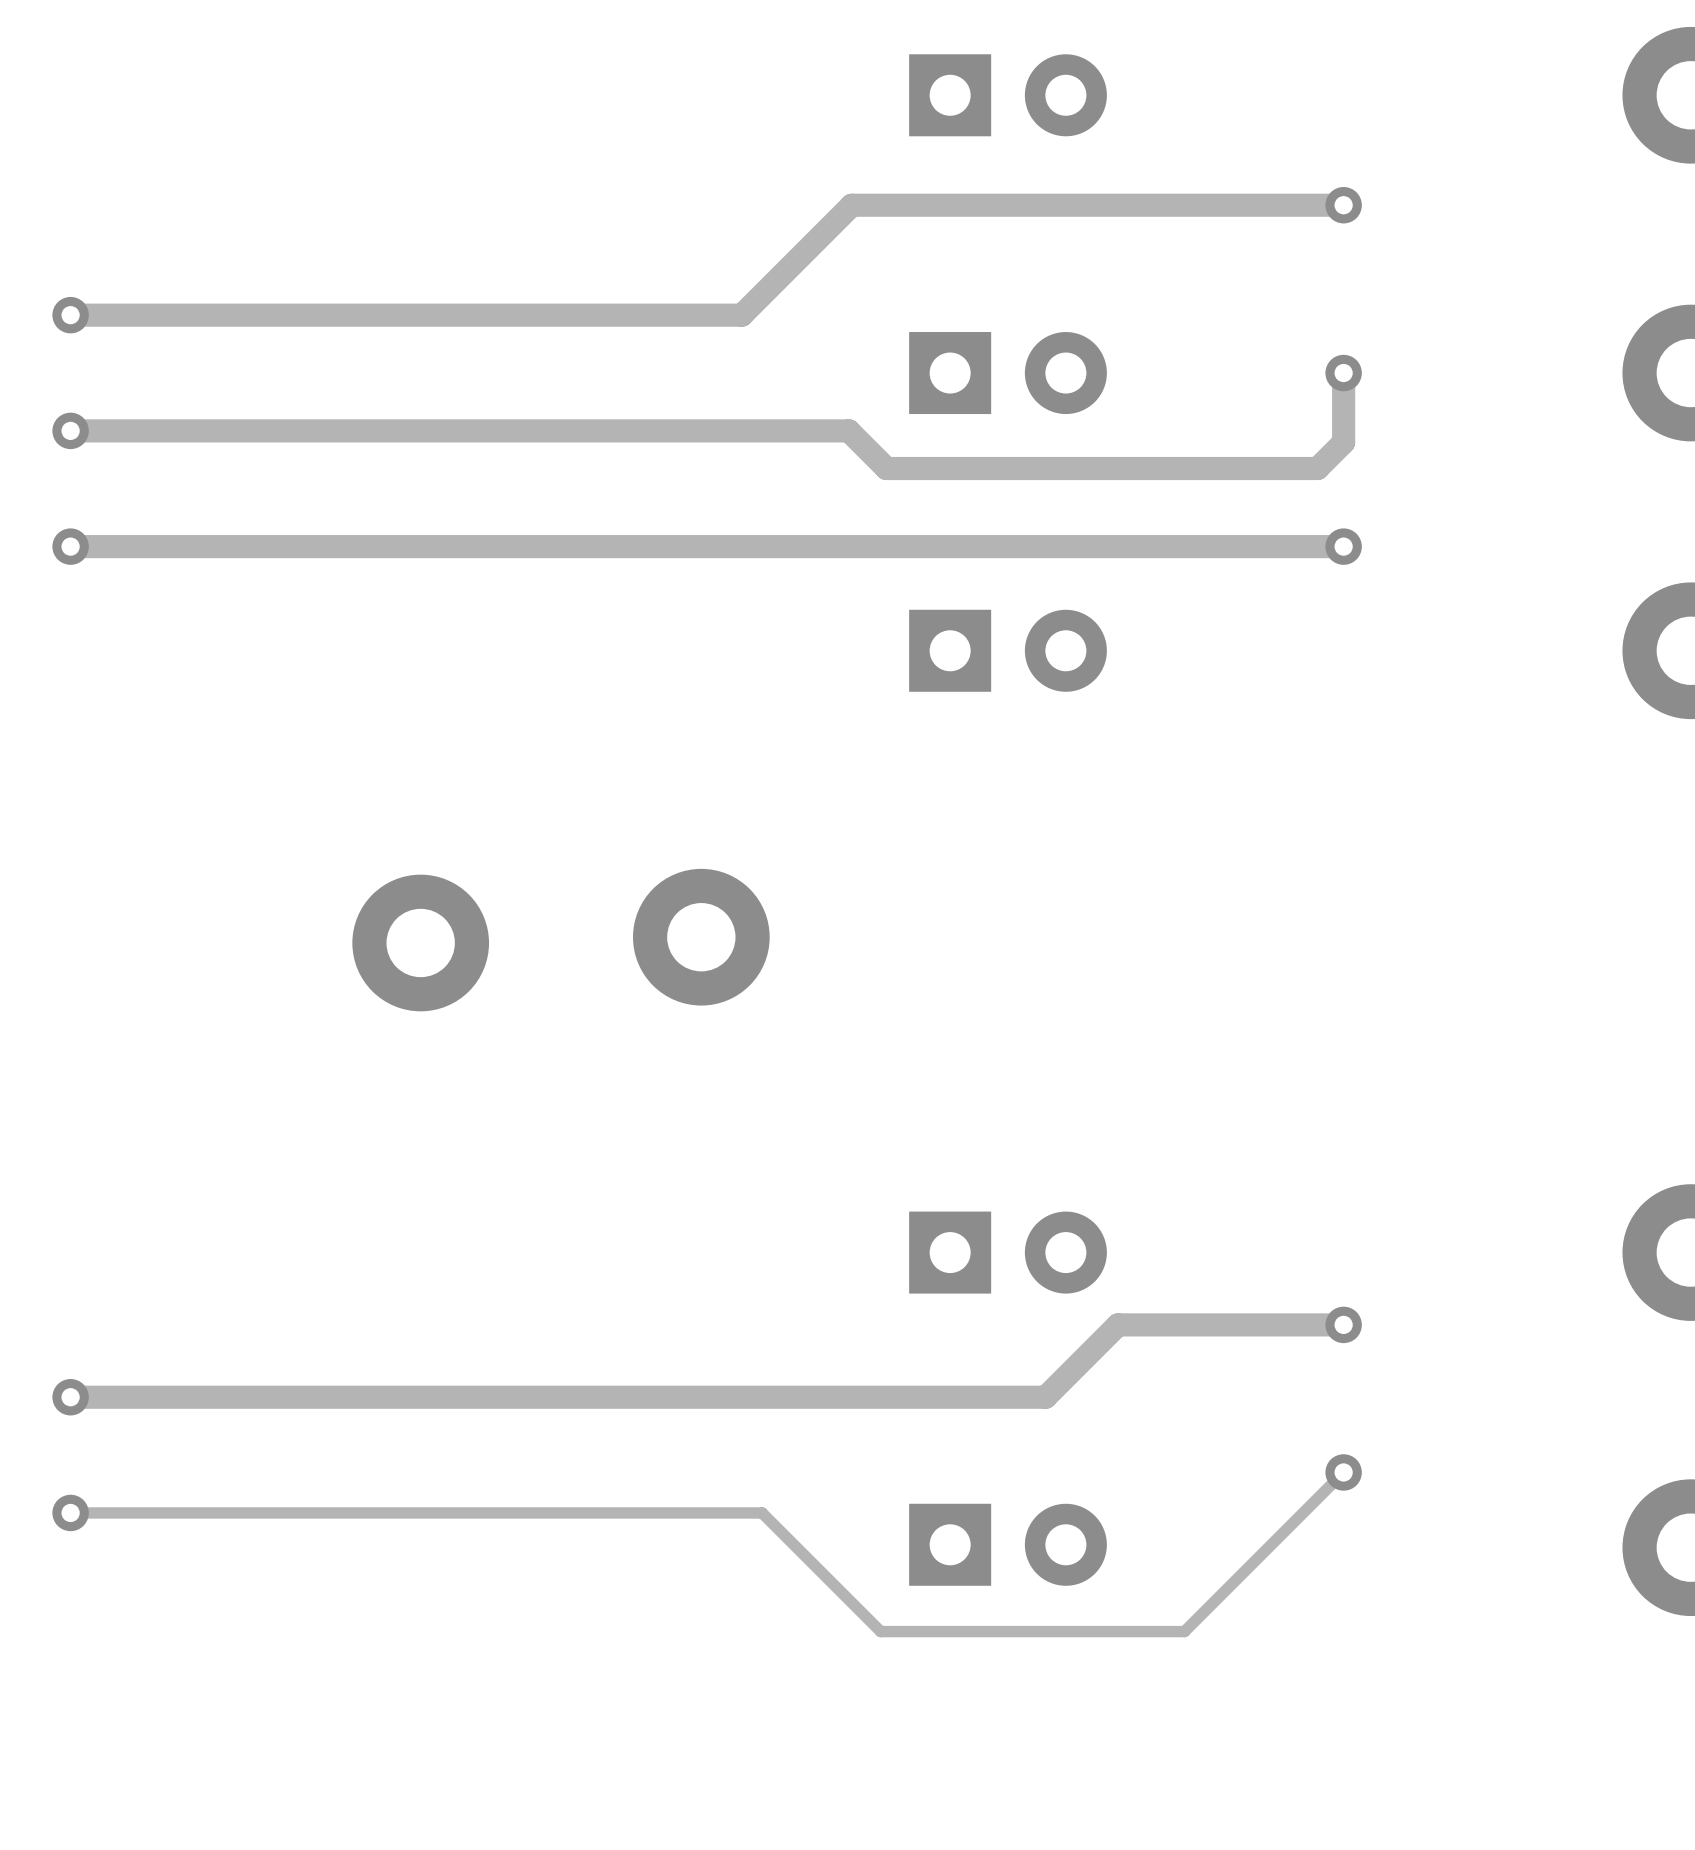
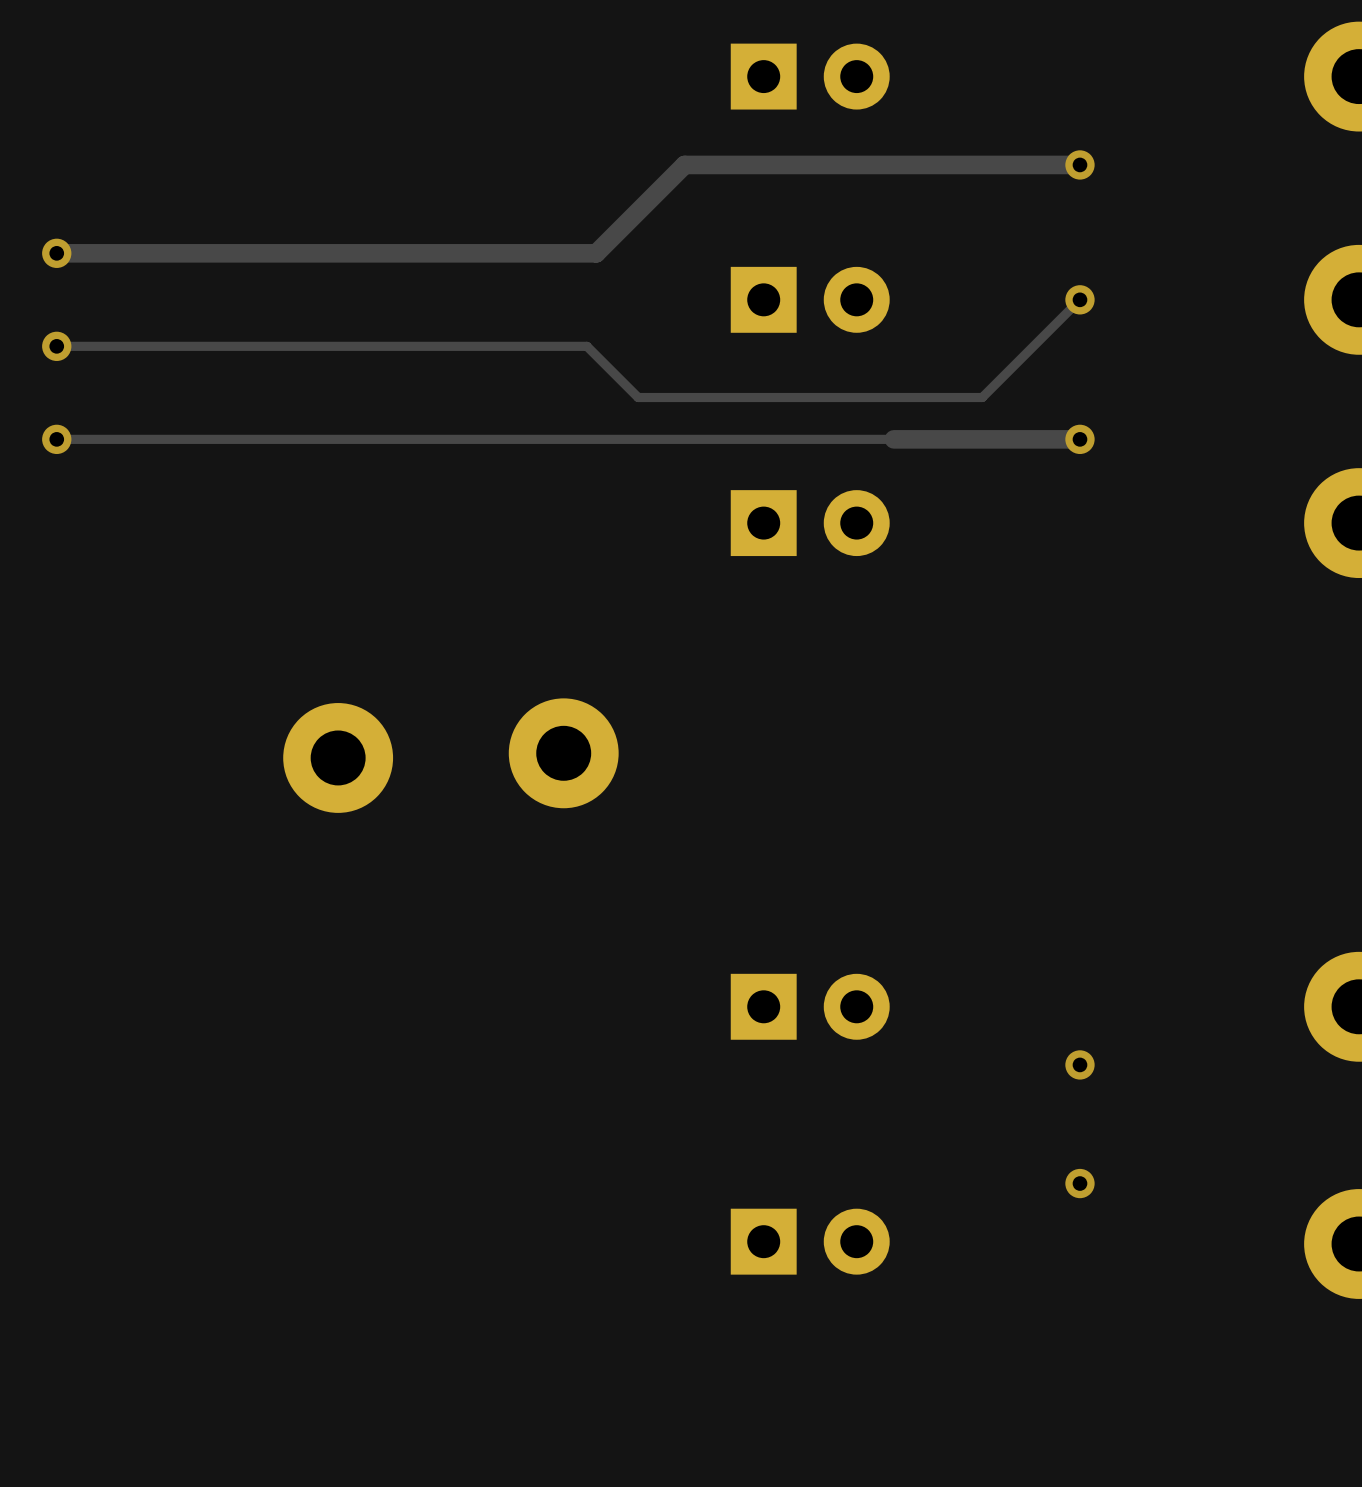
track: (1343, 373) (1343, 442) (1317, 468) (886, 468) (848, 430) (730, 430) -> (1079, 299) (982, 397) (638, 397) (586, 346)
track width: thick (730, 430) (70, 430) -> thin (586, 346) (56, 346)
track width: thick (1112, 546) (70, 546) -> thin (893, 439) (56, 439)
track: (1343, 1324) (1117, 1324) (1045, 1397) (70, 1397) -> none
via: (70, 1397) -> none
track: (1343, 1472) (1184, 1631) (880, 1631) (762, 1512) (70, 1512) -> none
via: (70, 1512) -> none

